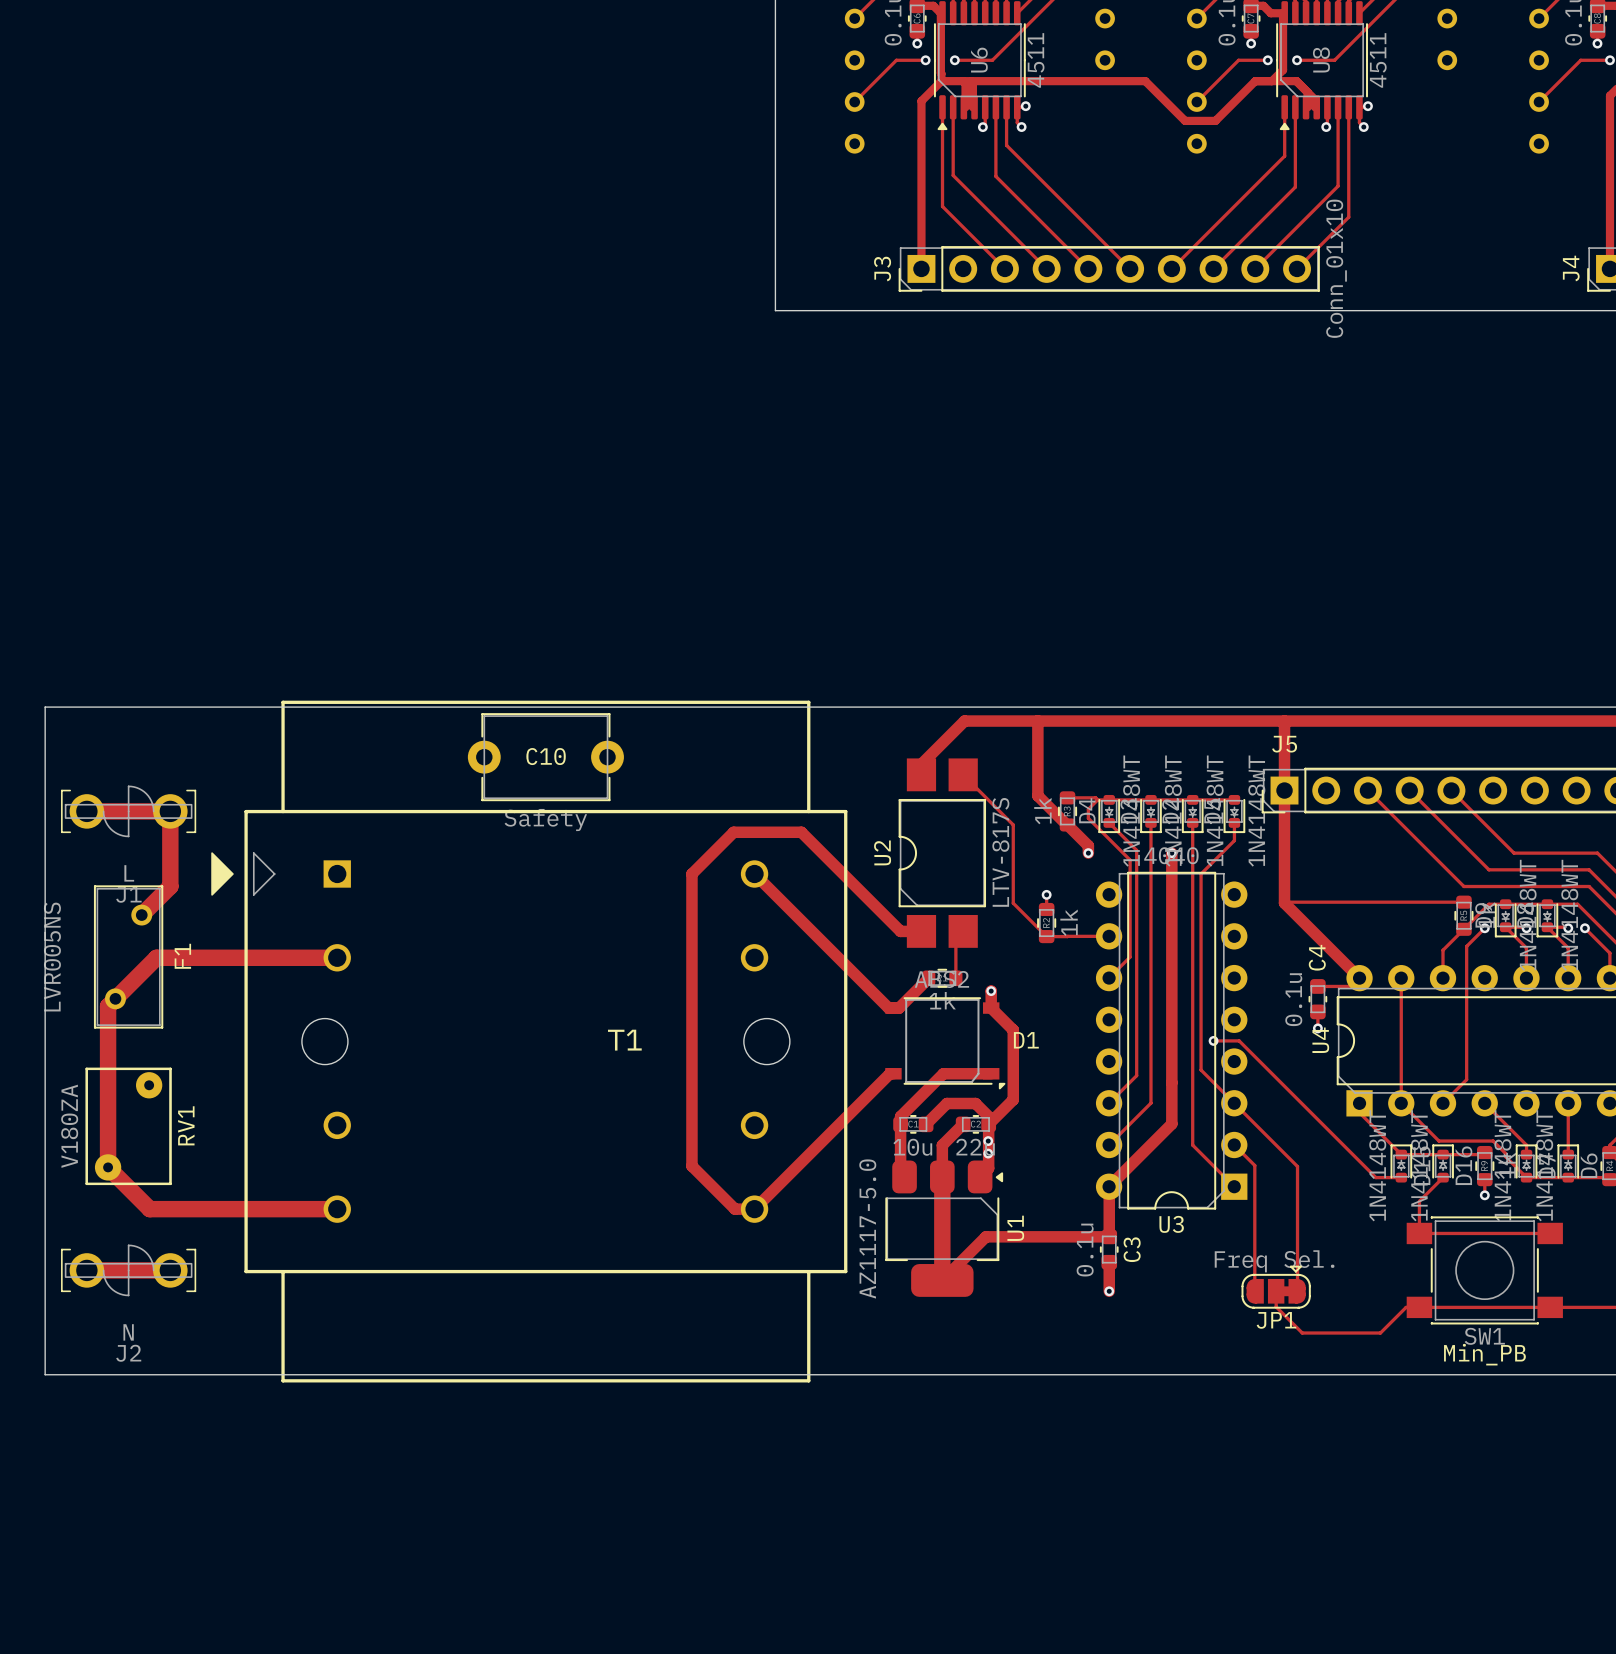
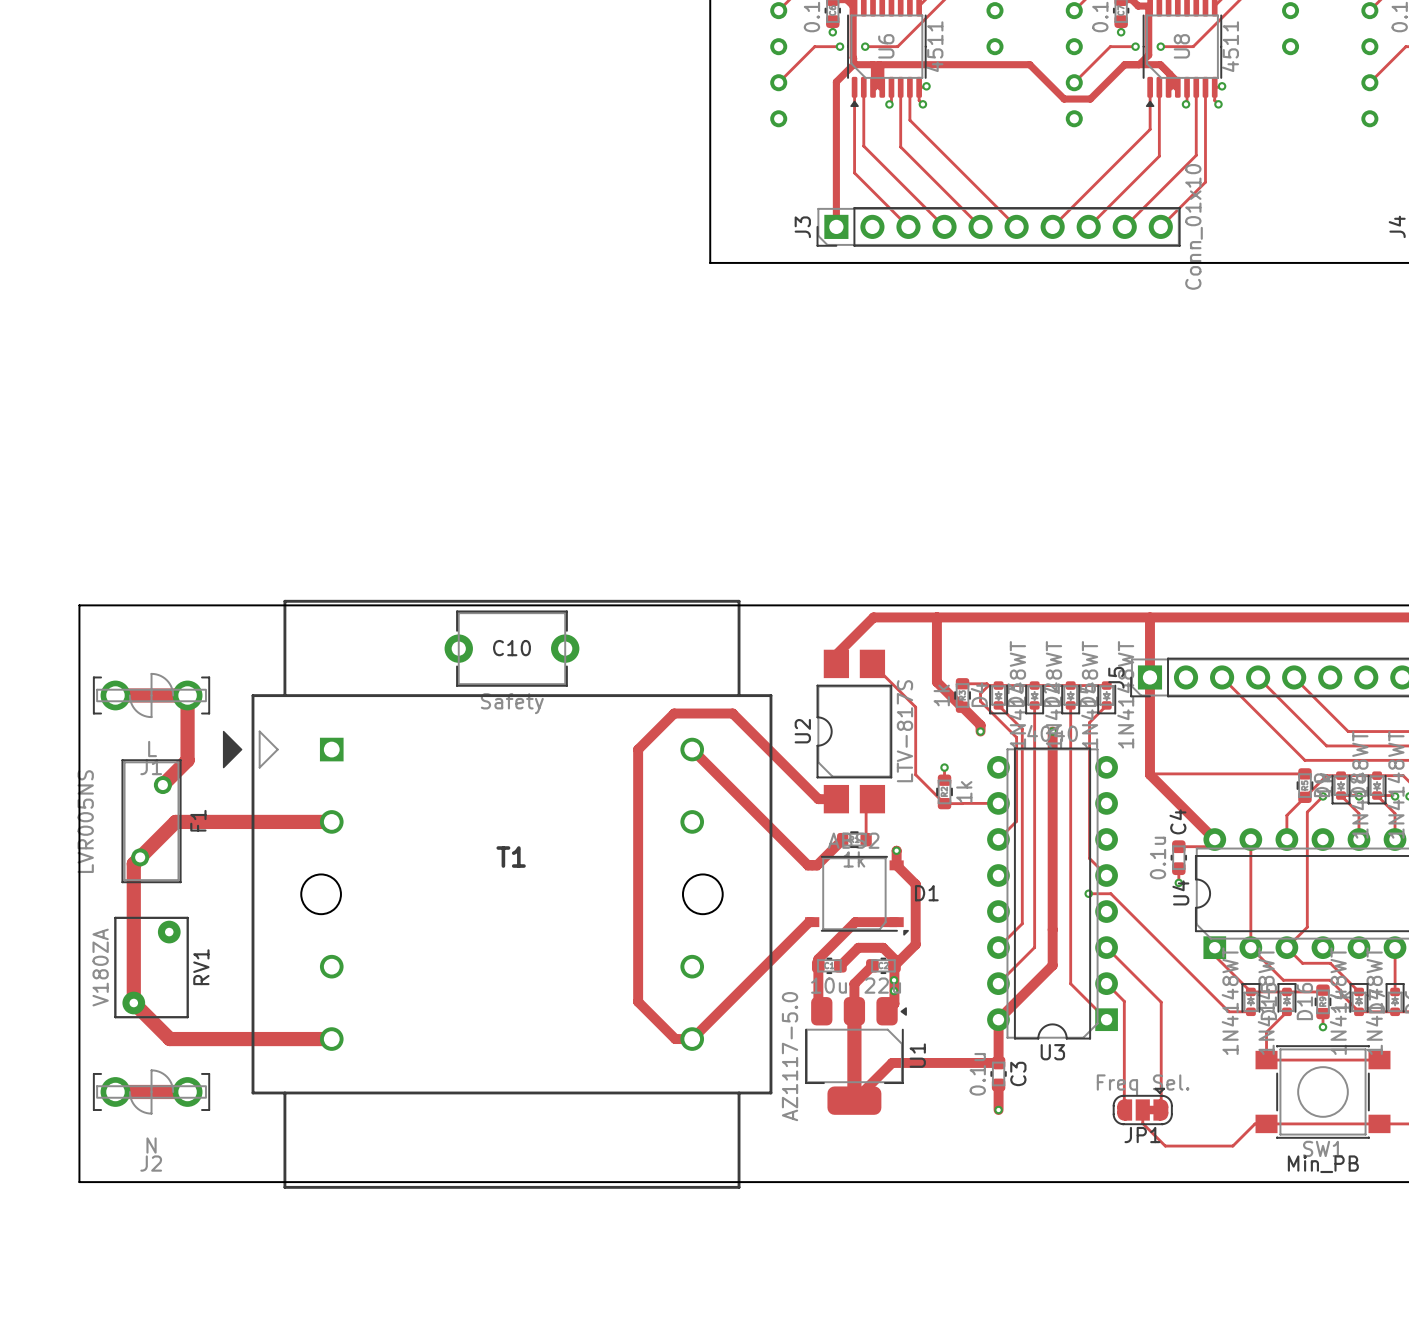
J5 name rotation: 0° (1284, 744) -> 90° counterclockwise (1116, 677)
J5 name position: J5 (1284, 744) -> J5 (1116, 677)
track: (1234, 822) (1234, 840) (1201, 874) (1201, 1070) (1234, 1103) -> (1106, 705) (1089, 722) (1089, 858) (1106, 875)
T1 name position: T1 (624, 1040) -> T1 (511, 857)
track: (1484, 1103) (1526, 1145) (1526, 1154) -> (1286, 947) (1302, 963) (1330, 963) (1359, 991)

